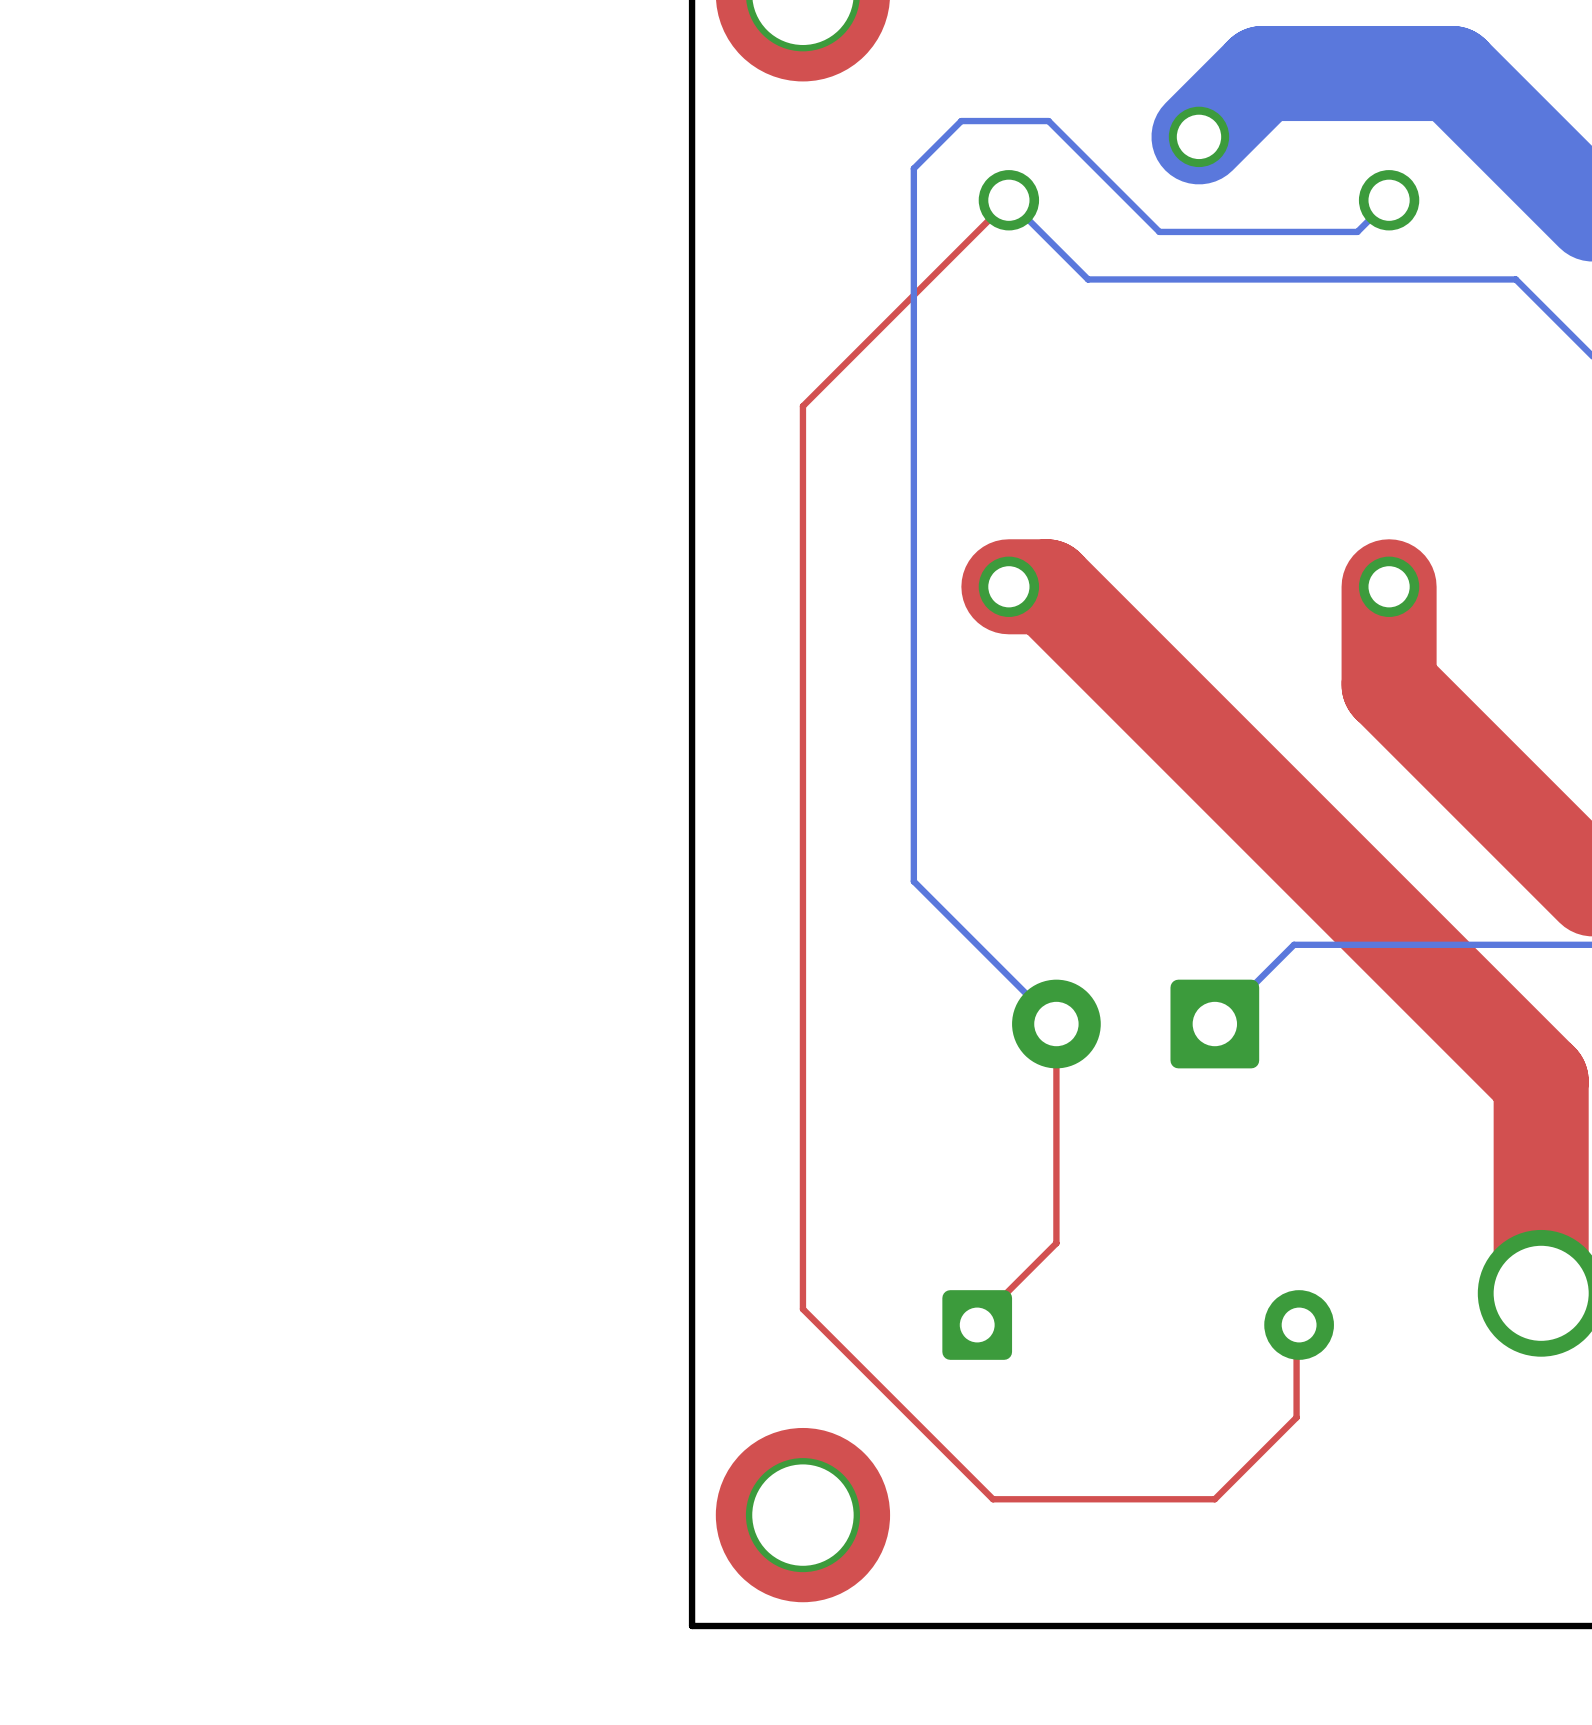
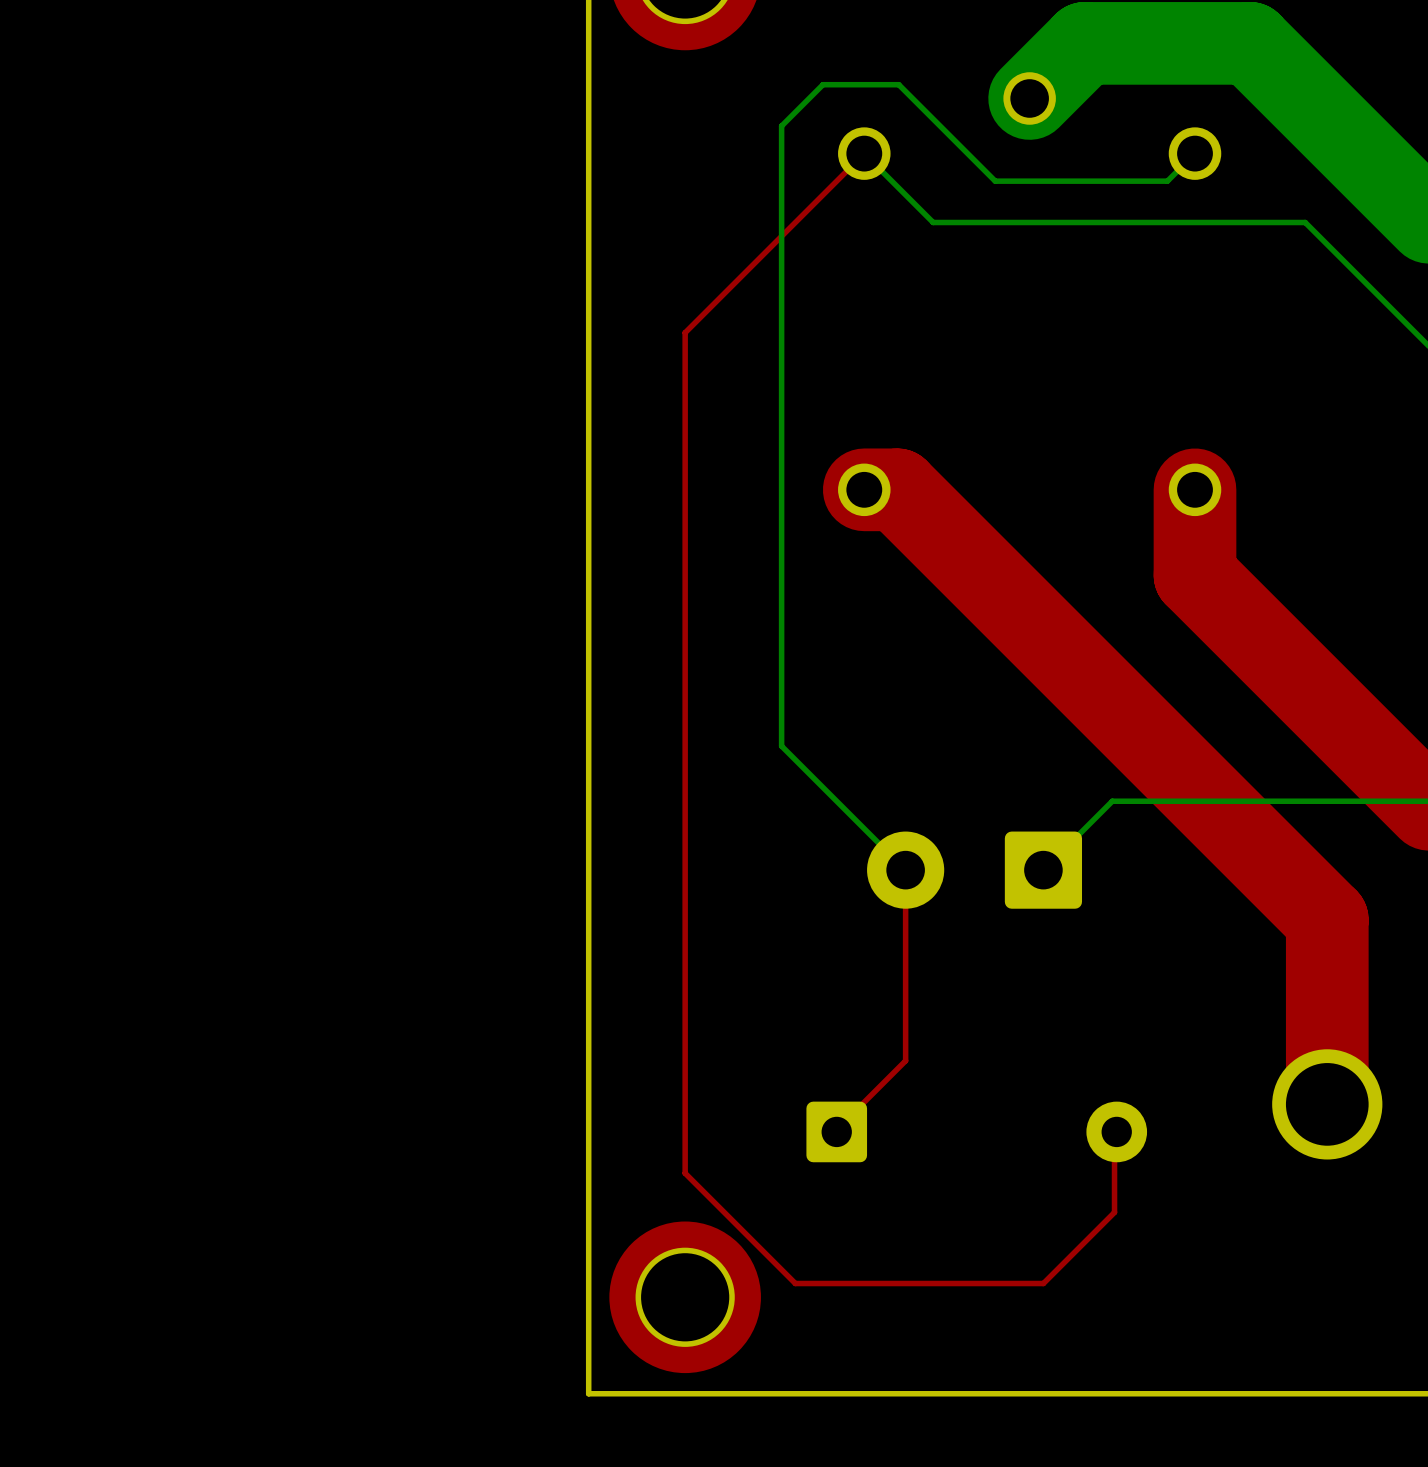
top track: (802, 1309) (993, 1499) -> (685, 1118) (685, 1173) (795, 1283) (850, 1283)

